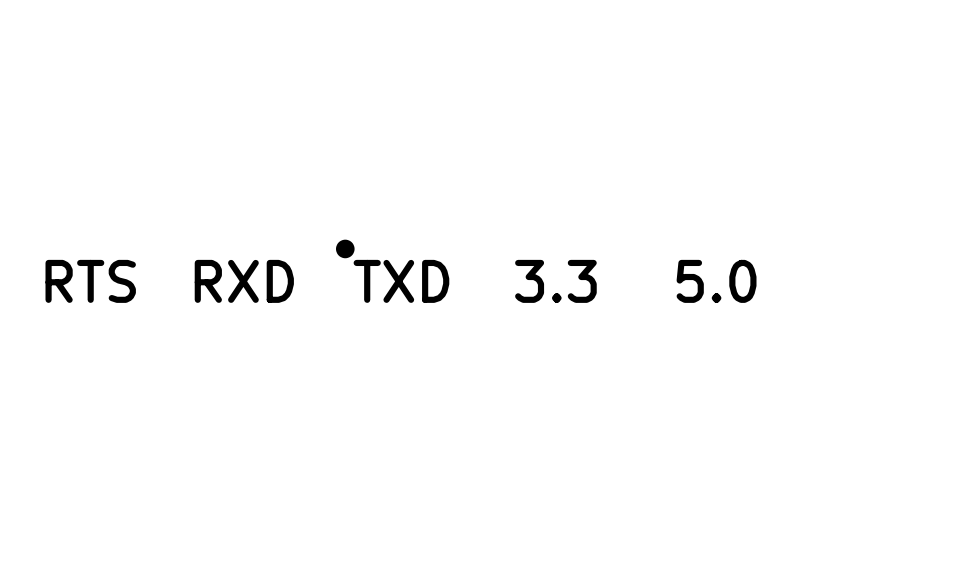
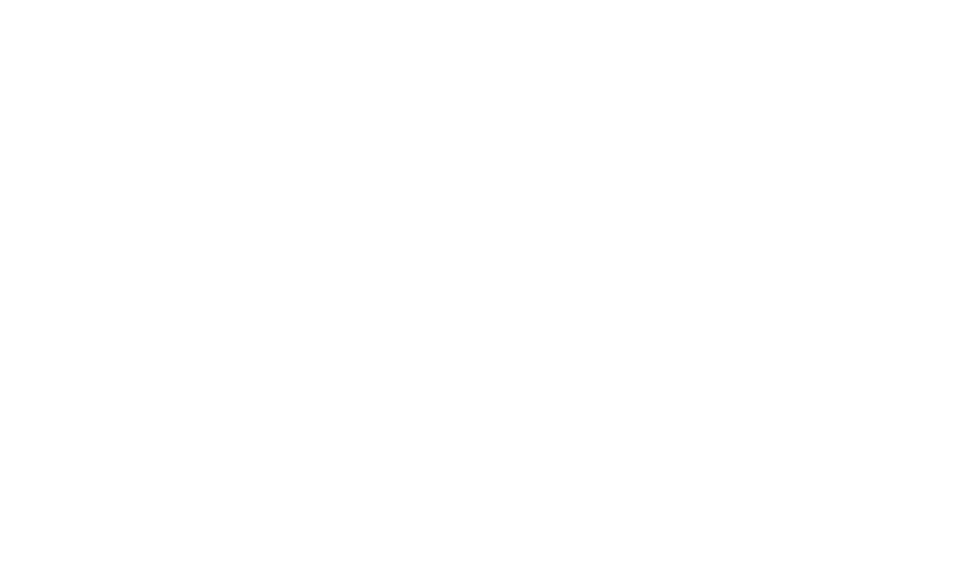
drawing: [335, 239, 355, 259] -> none
text: RTS (90, 281) -> none
text: RXD (244, 281) -> none
text: TXD (401, 281) -> none
text: 3.3 (555, 281) -> none
text: 5.0 (716, 281) -> none

